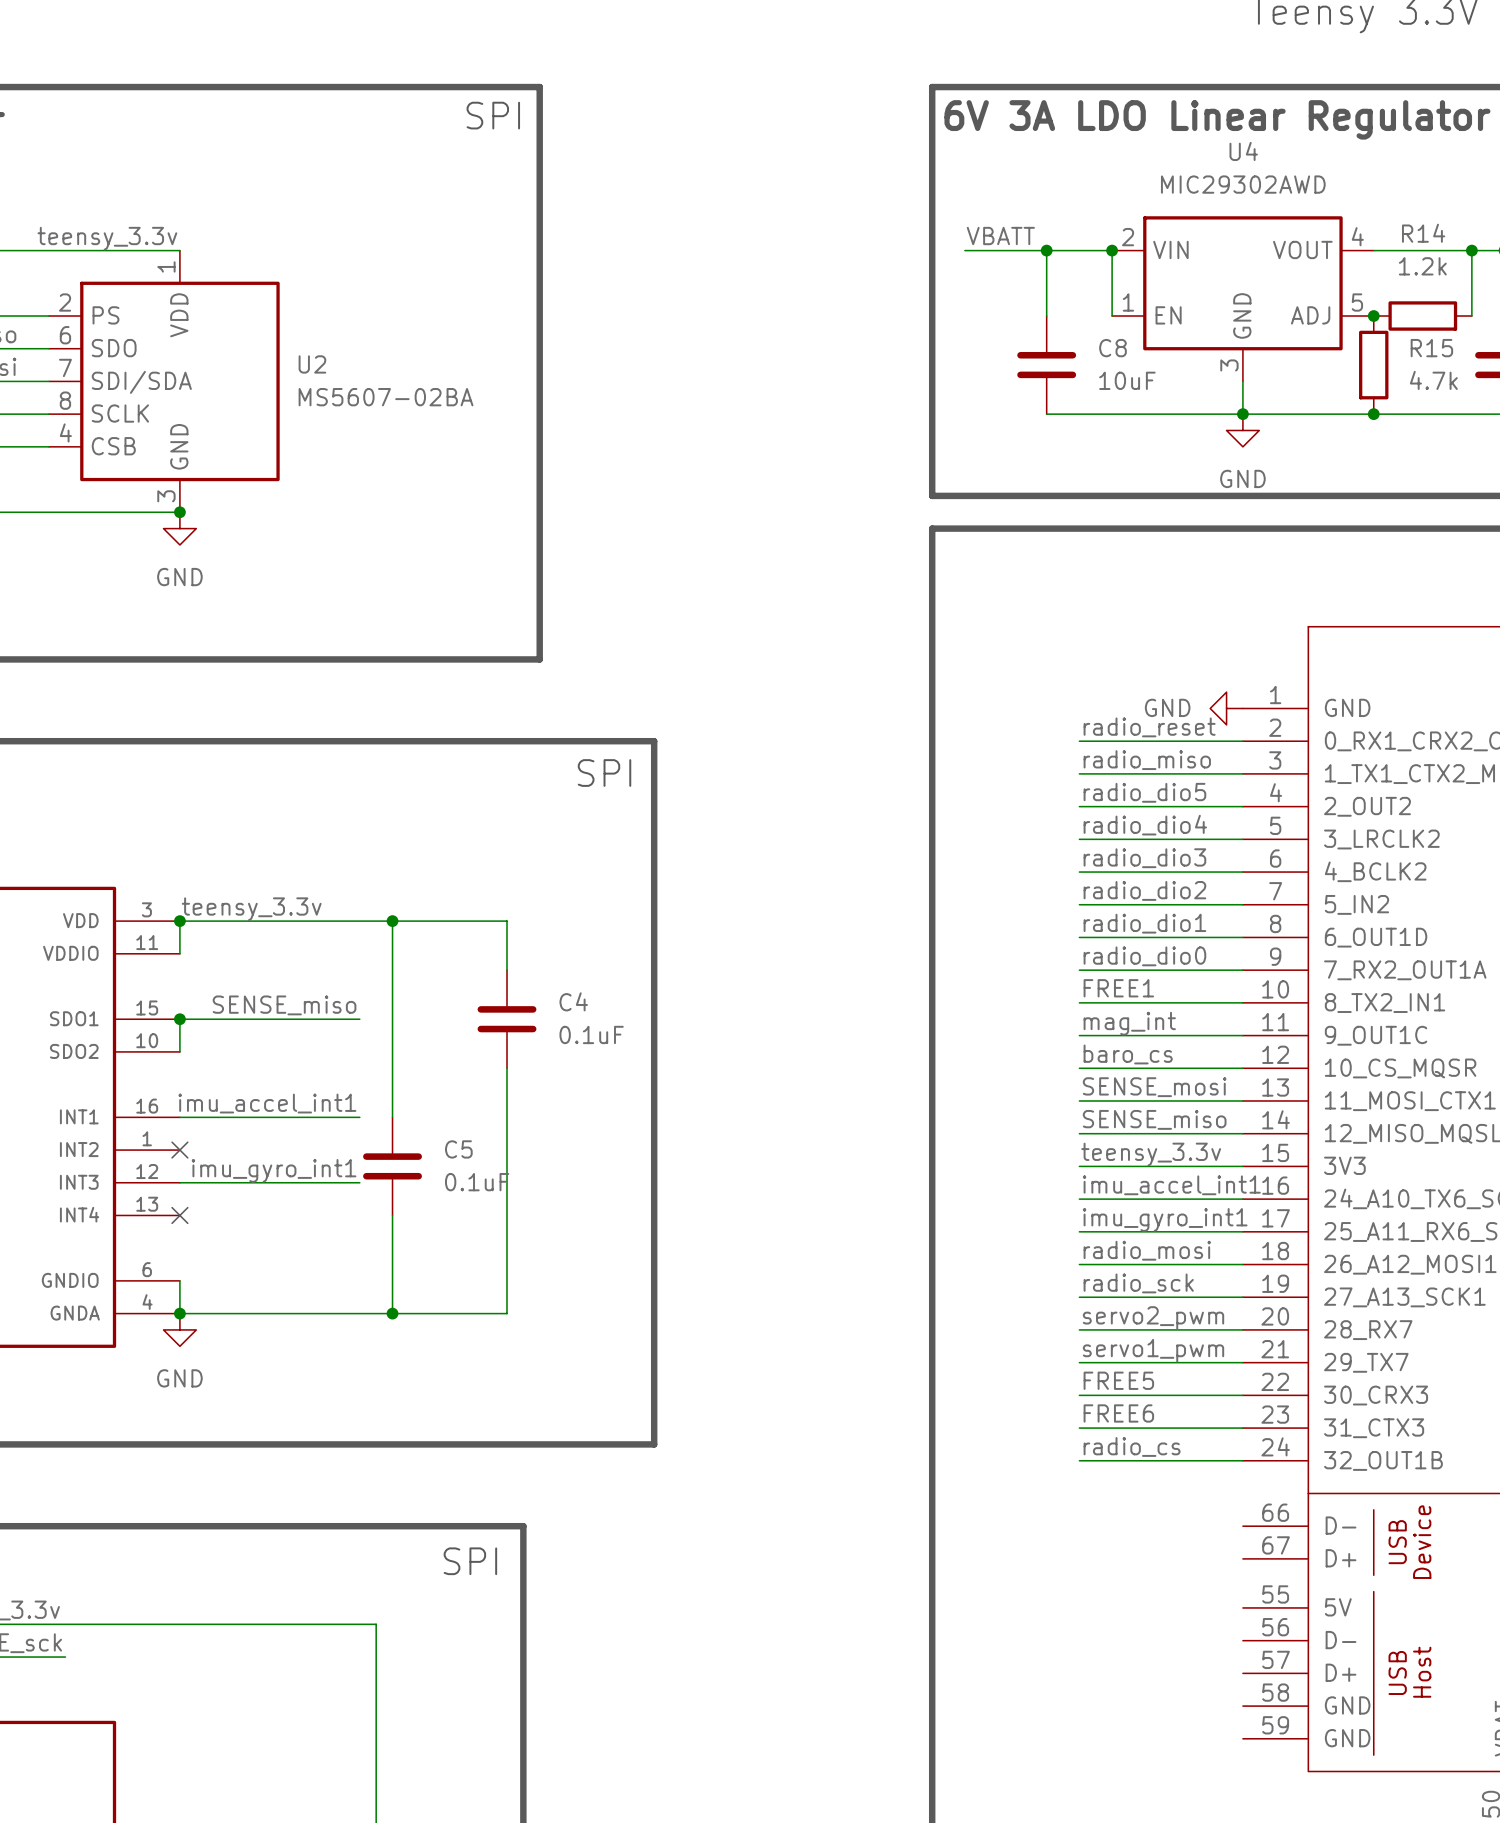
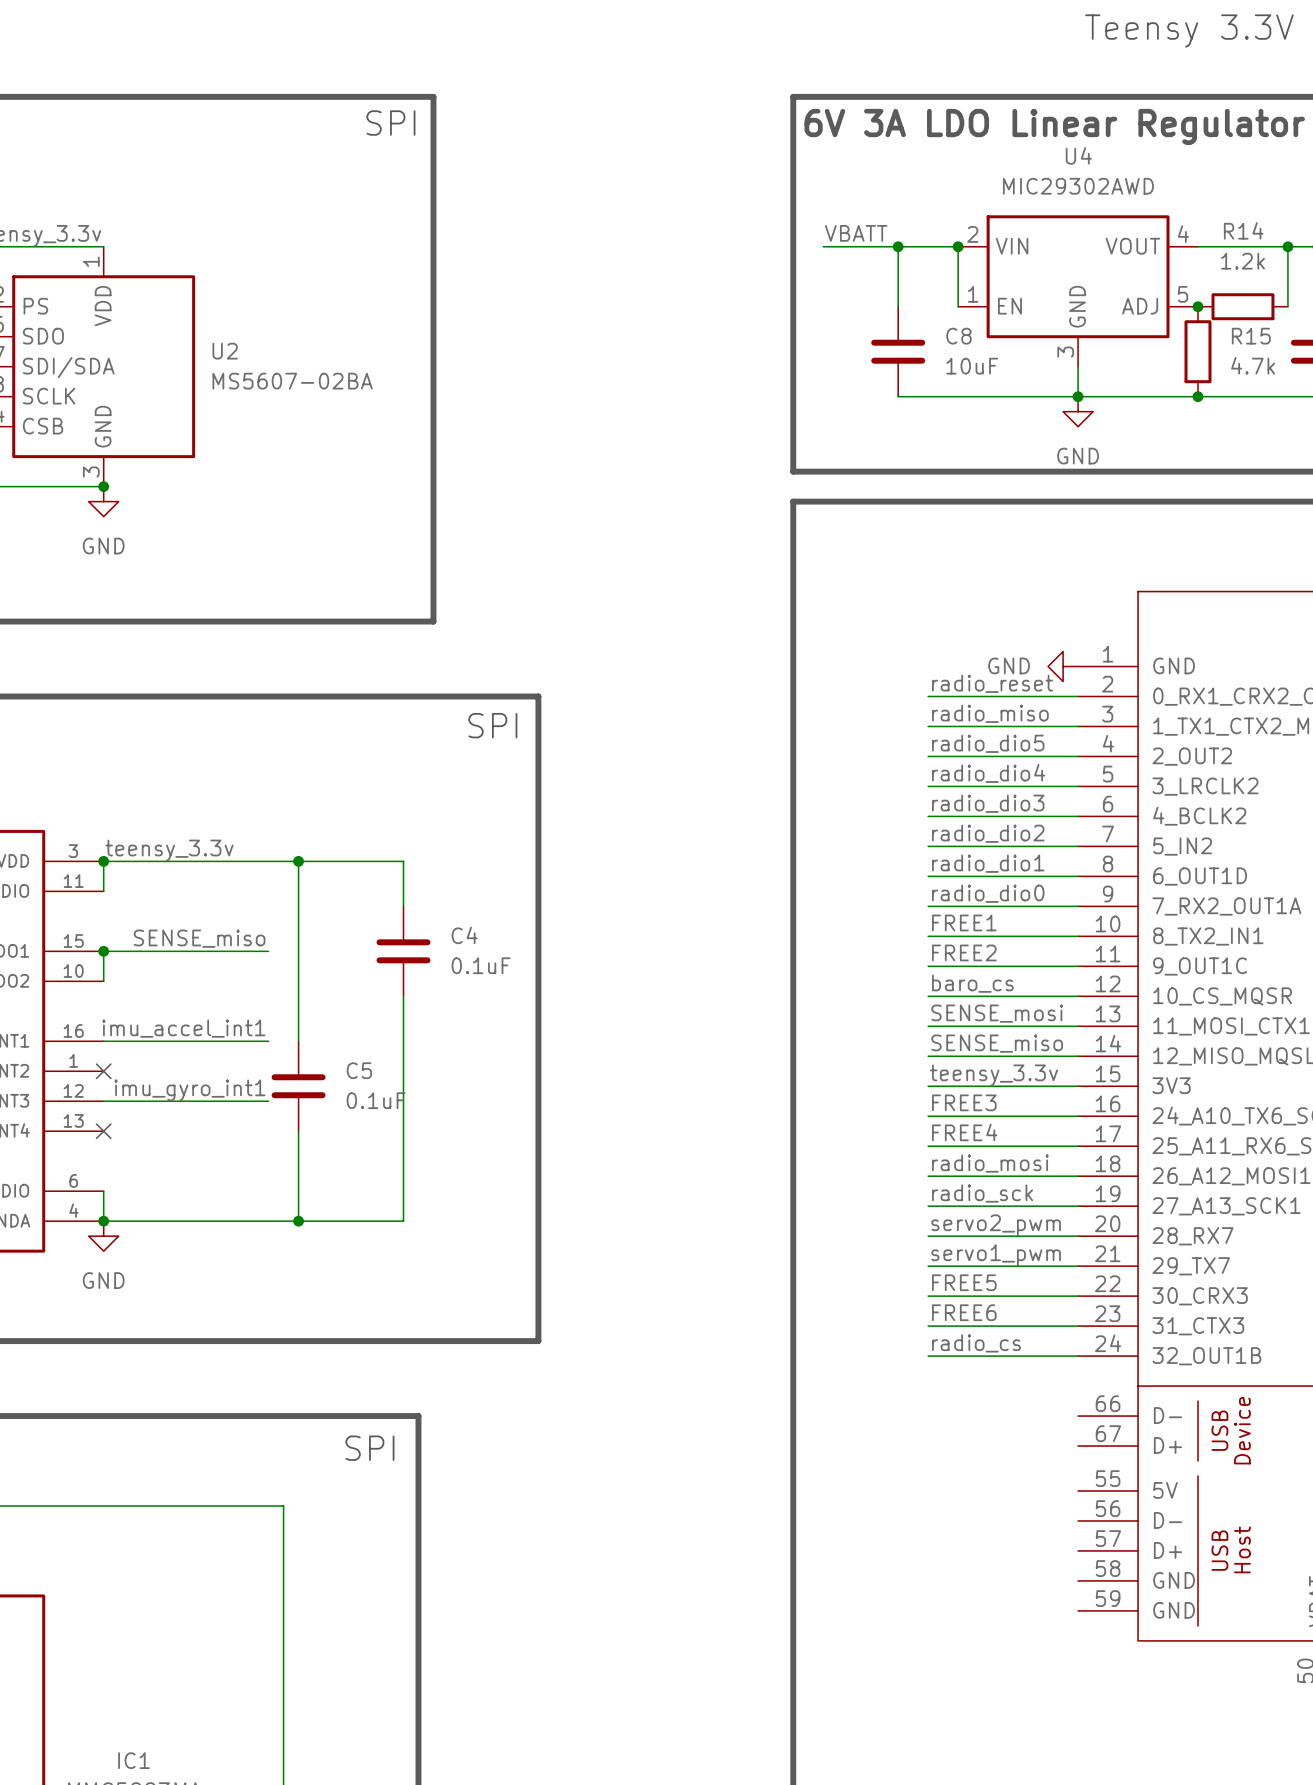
label: mag_int (1129, 1023) -> FREE2 (964, 952)
label: imu_accel_int1 (1171, 1185) -> FREE3 (964, 1102)
label: imu_gyro_int1 (1165, 1219) -> FREE4 (964, 1132)

